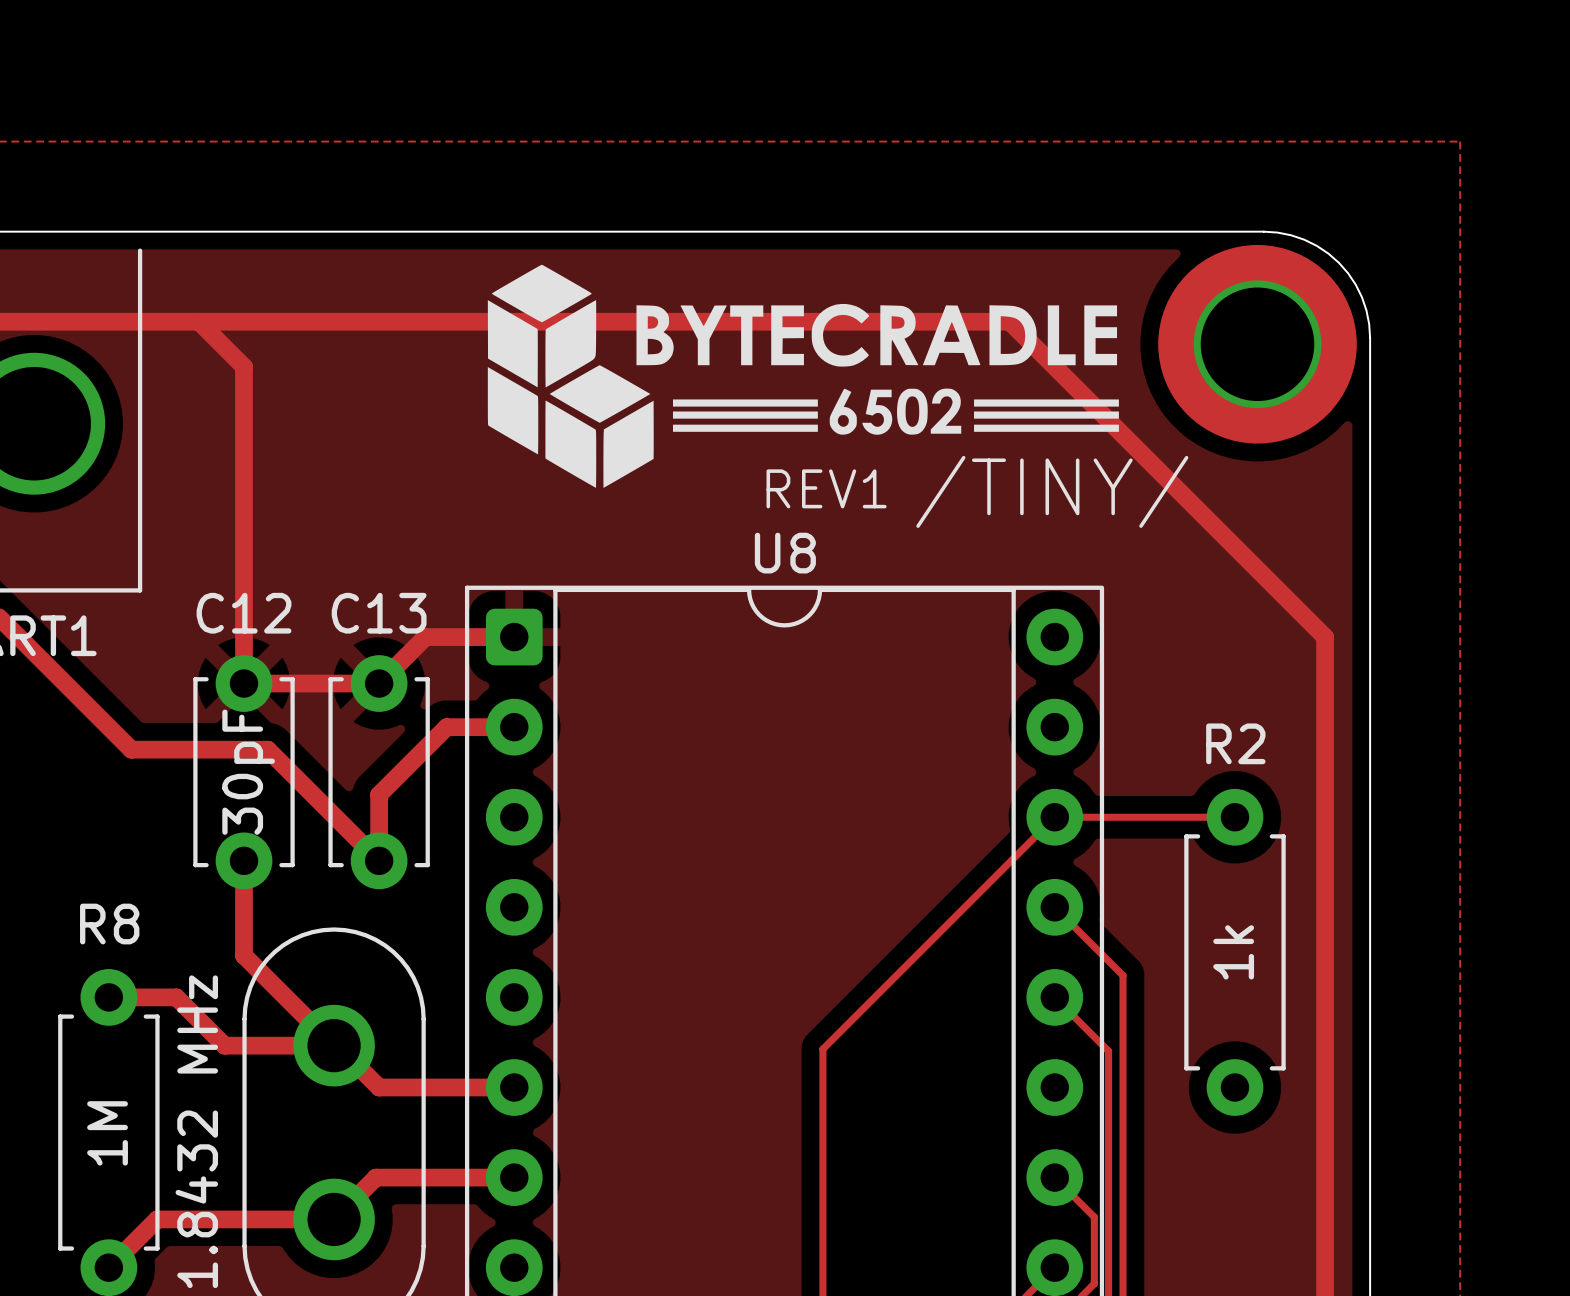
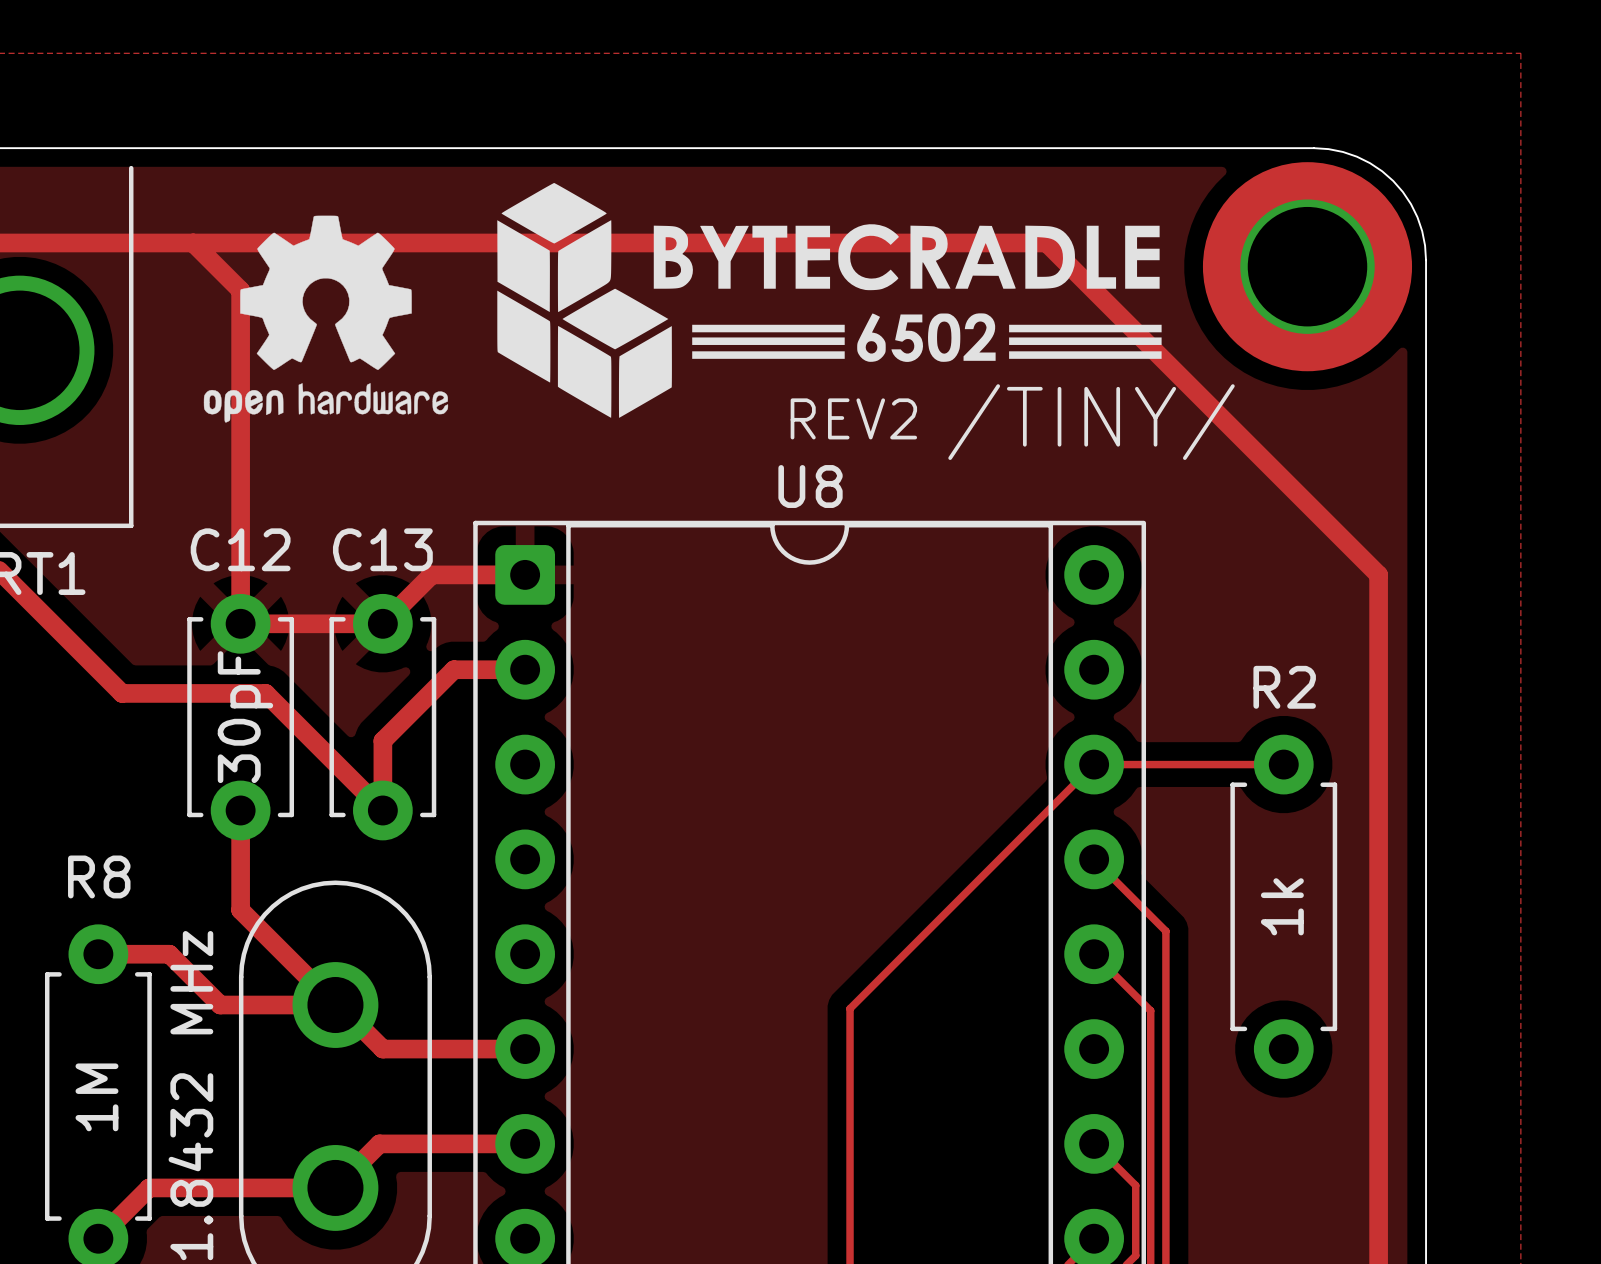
drawing: none -> [203, 215, 449, 423]
text: REV1 (826, 488) -> REV2 (853, 418)

